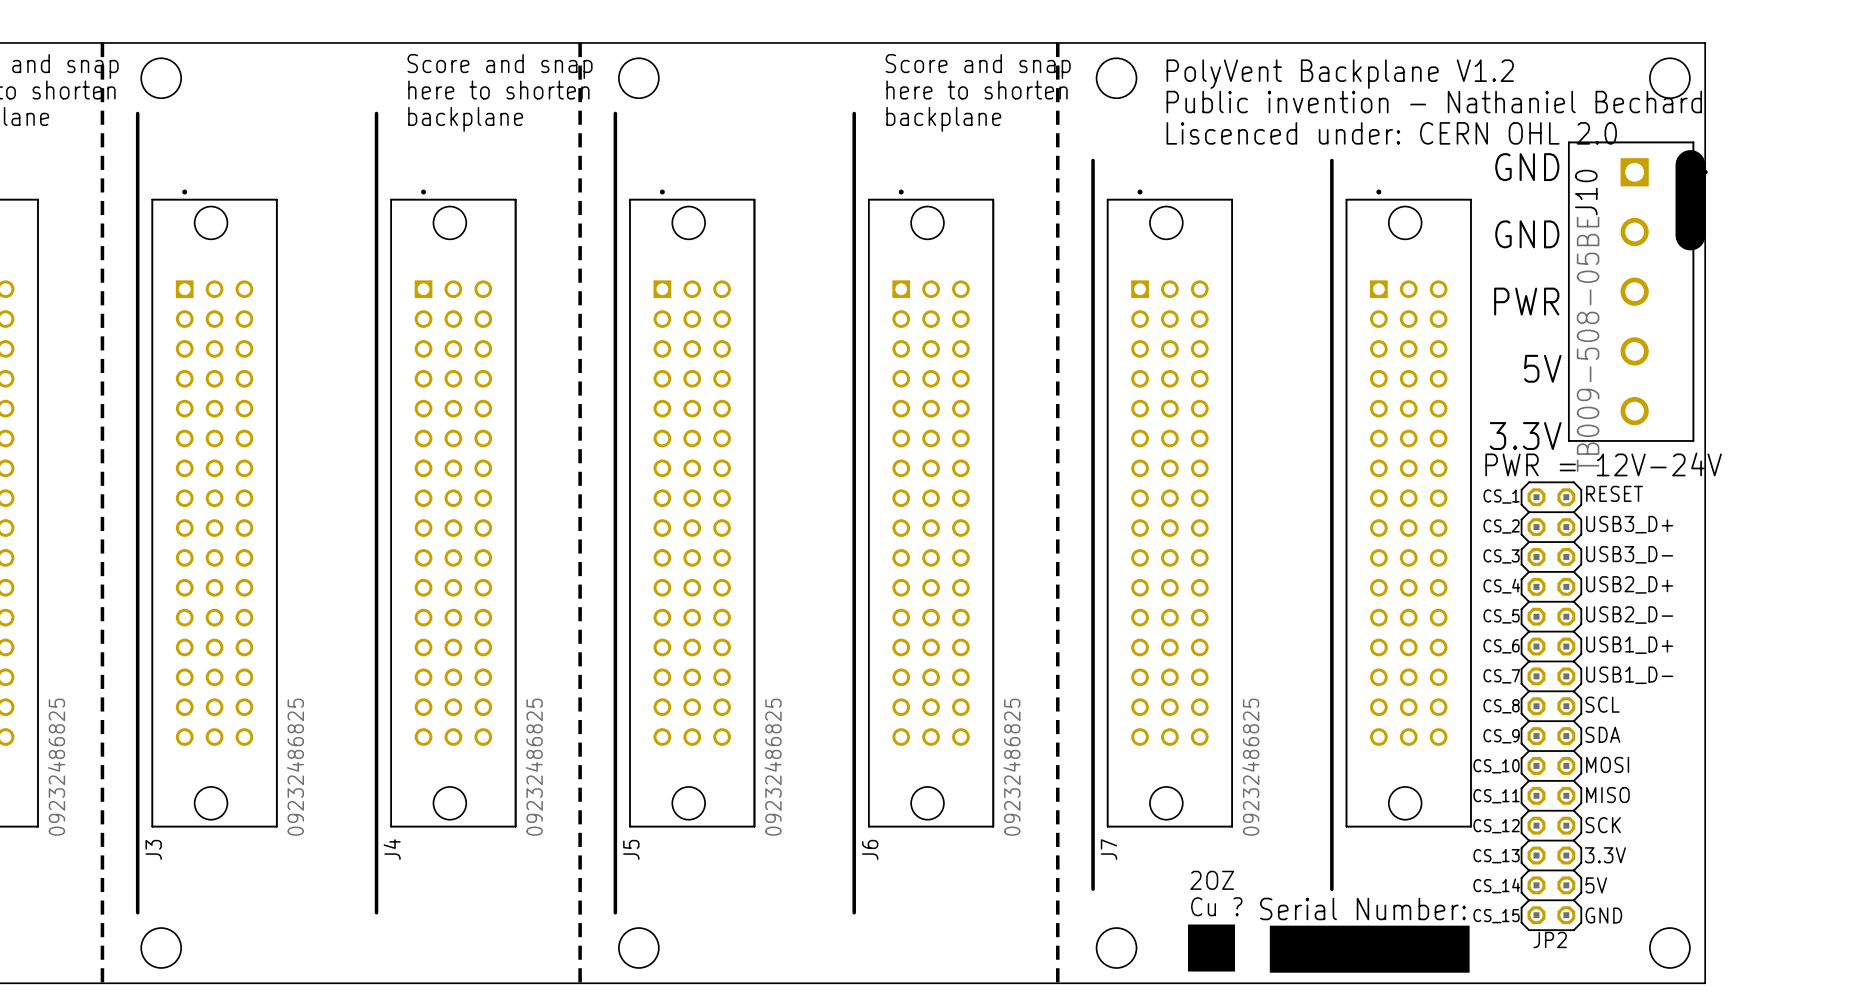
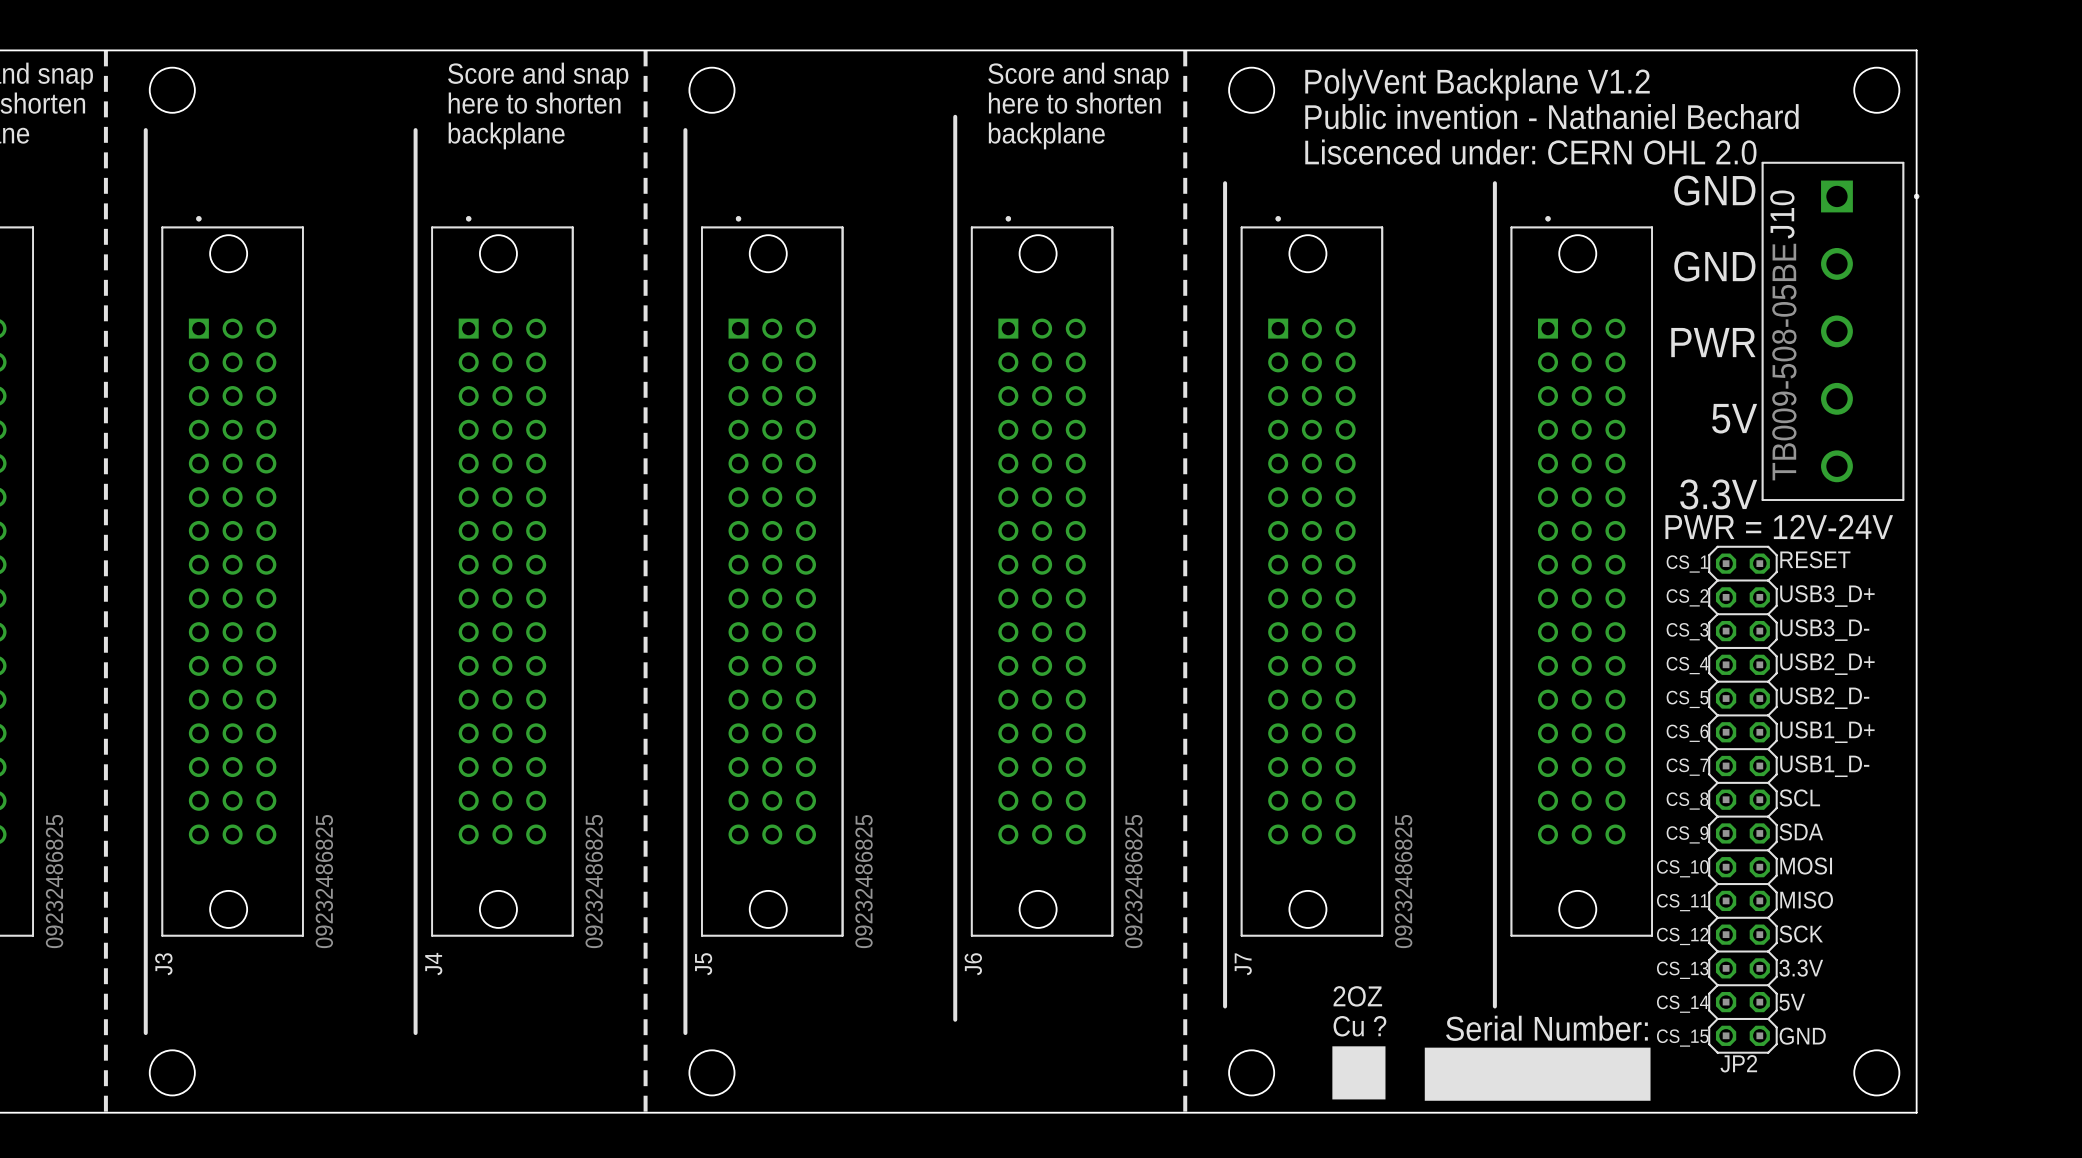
line: none -> (955, 116) (955, 130)
line: (1690, 164) (1690, 235) -> none
line: (854, 901) (854, 912) -> none

